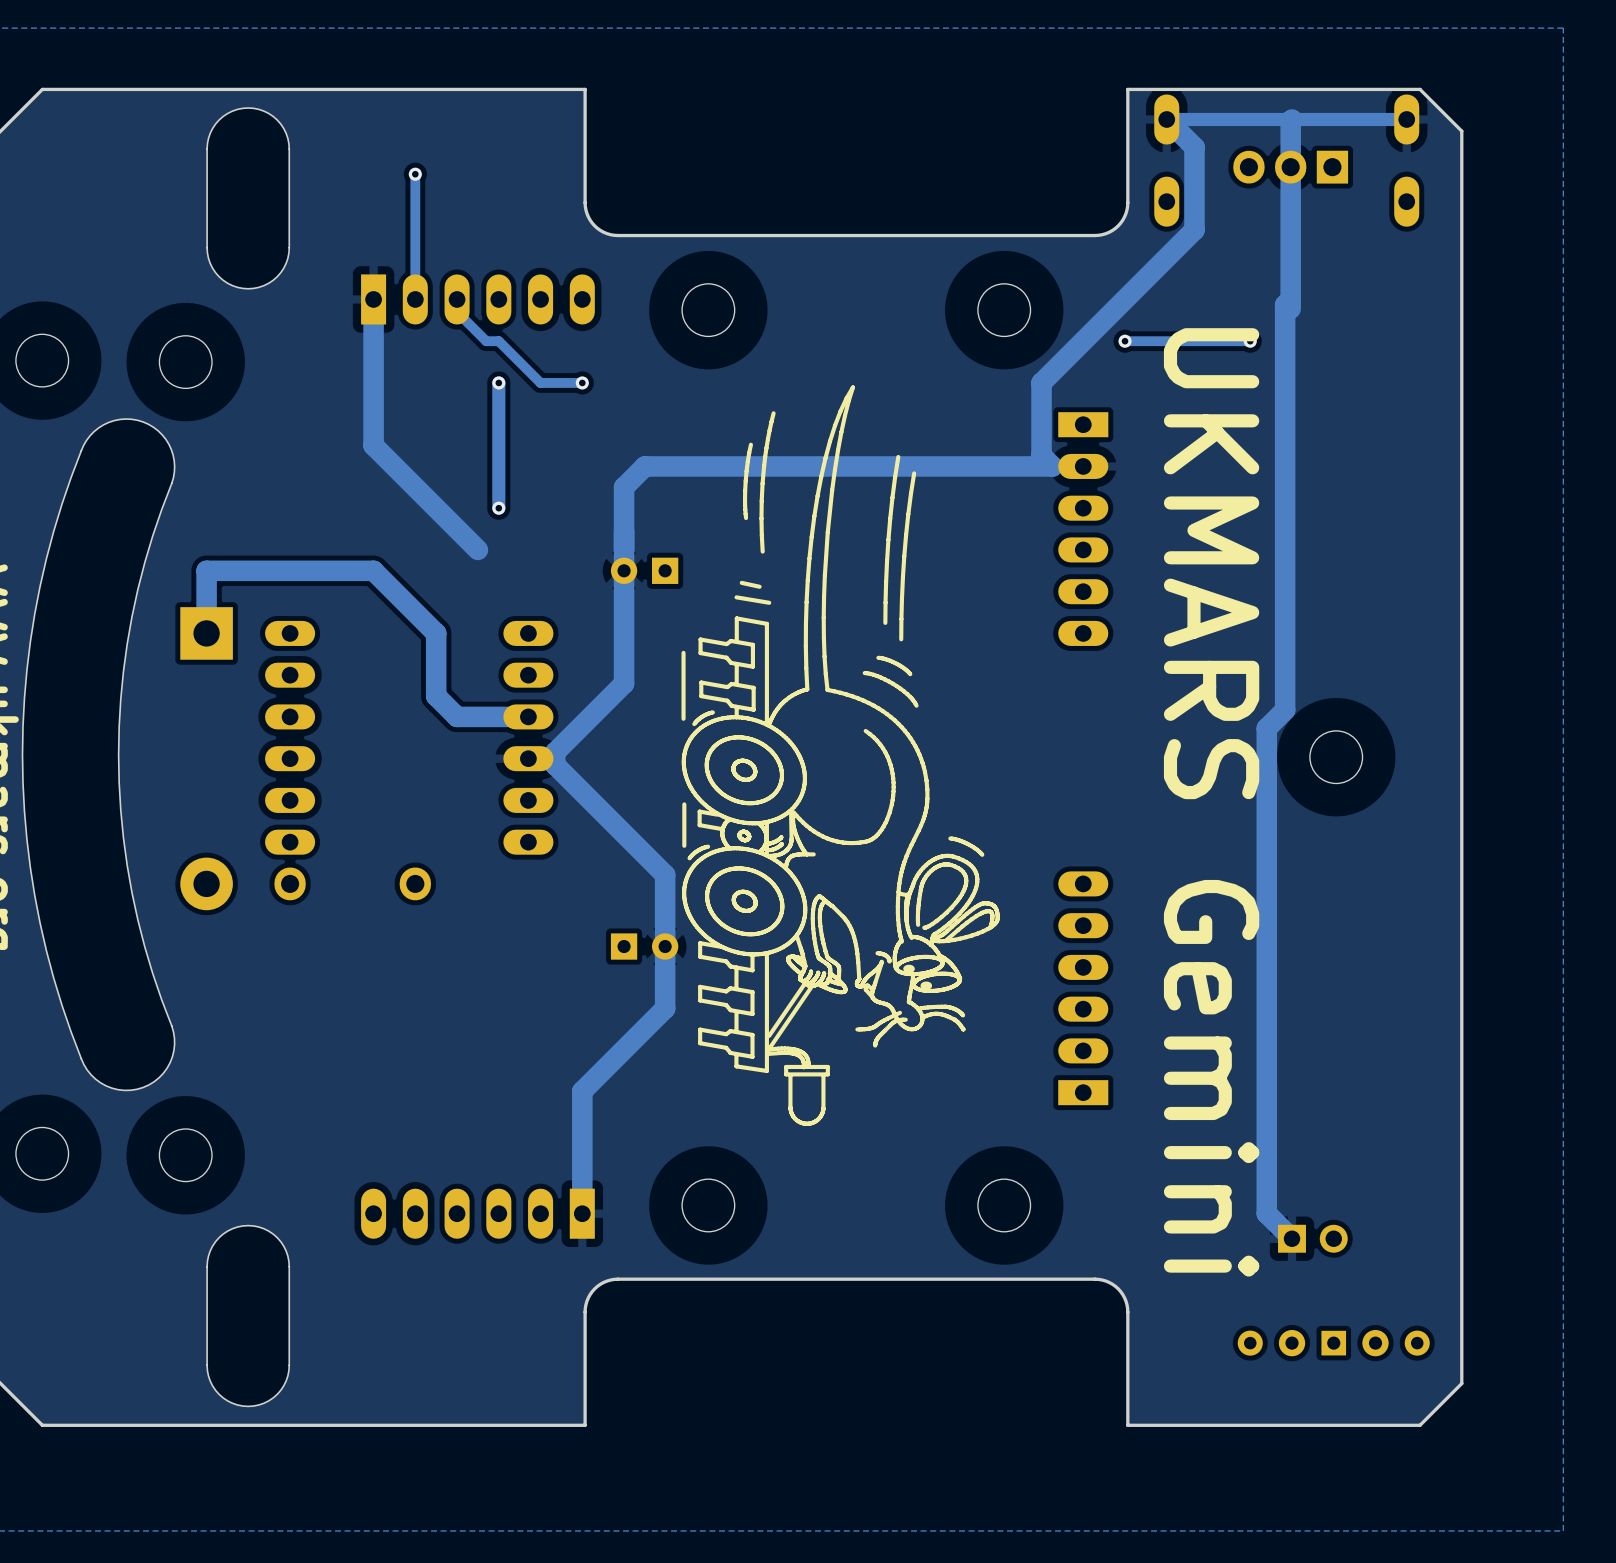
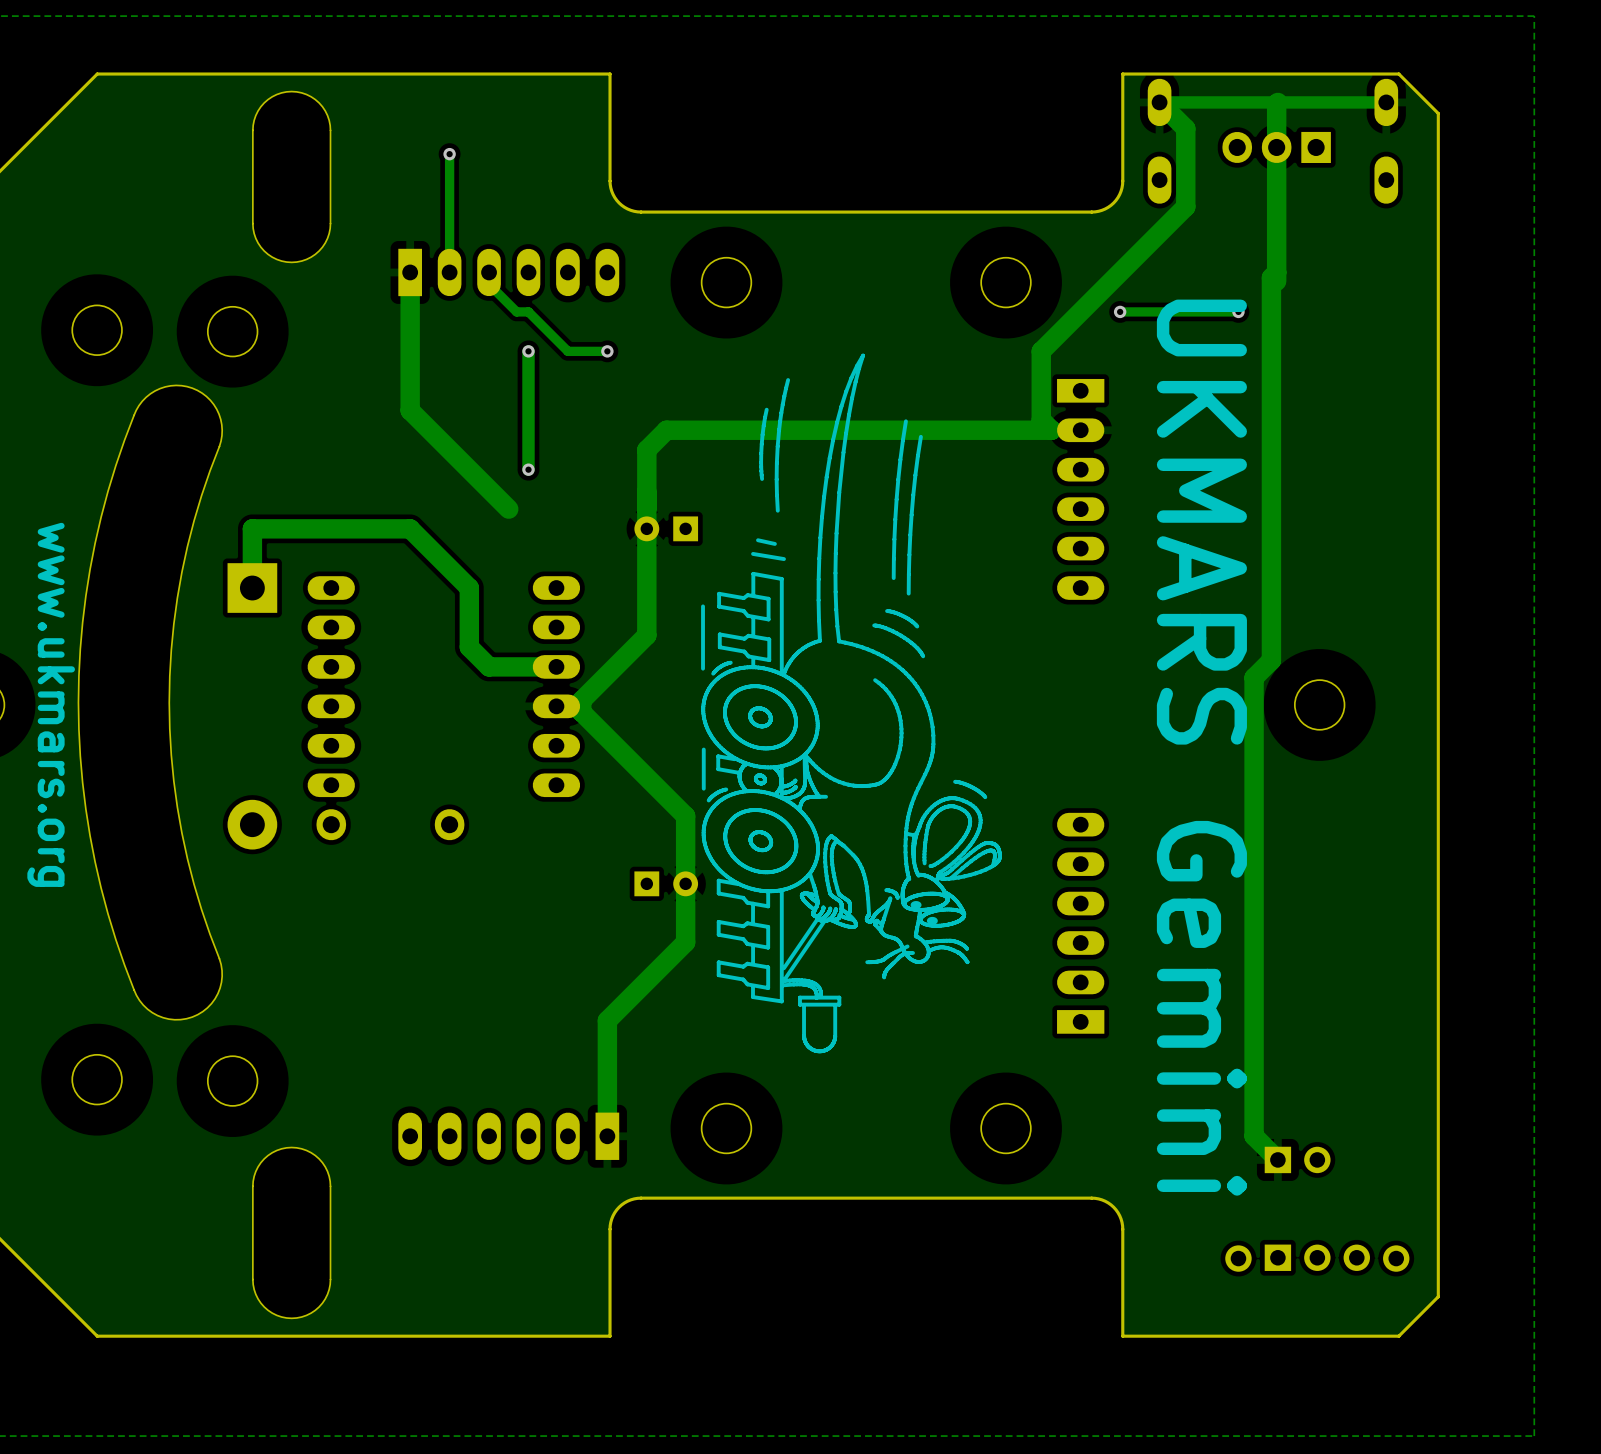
part footprint: [1237, 1329, 1430, 1357] -> [1264, 1244, 1370, 1271]
part: none -> (1238, 1258)
part: none -> (1396, 1258)

